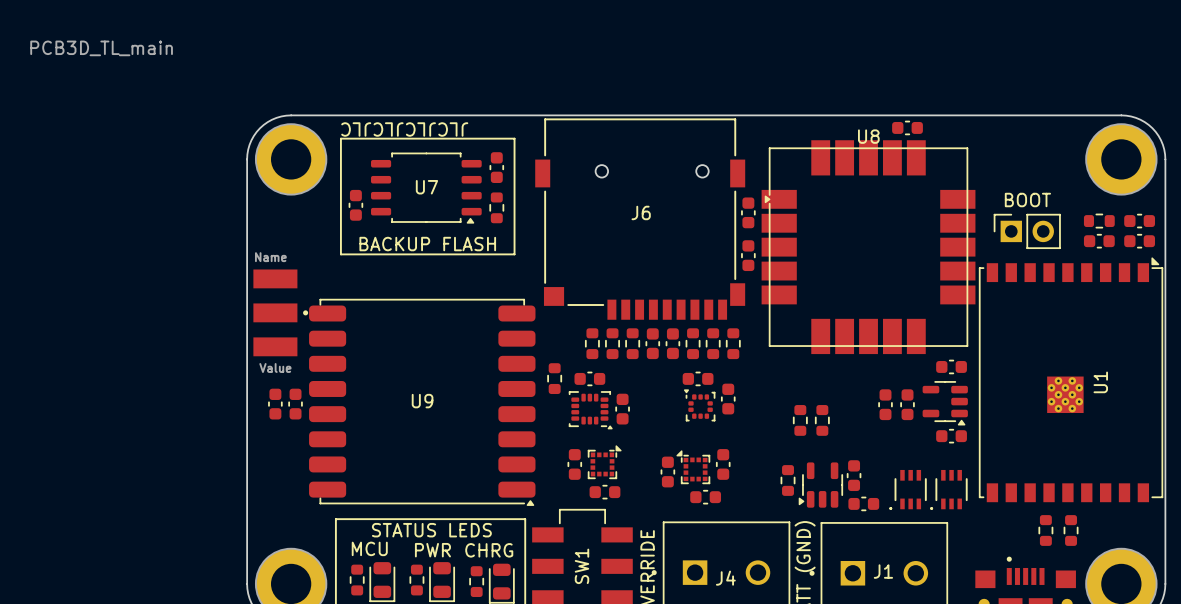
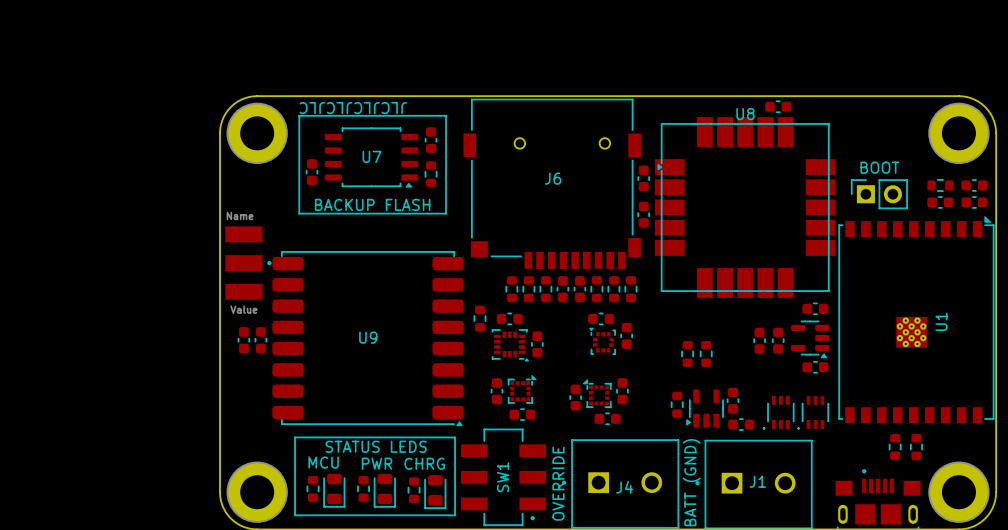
text: PCB3D_TL_main (101, 48) -> none

